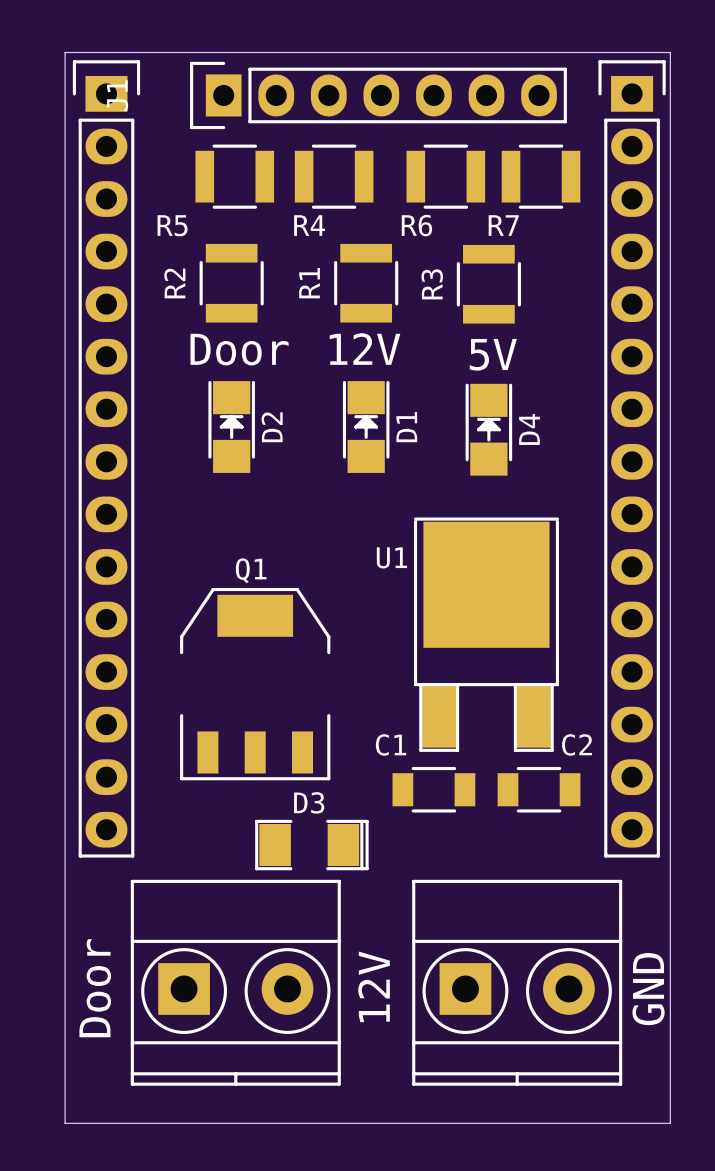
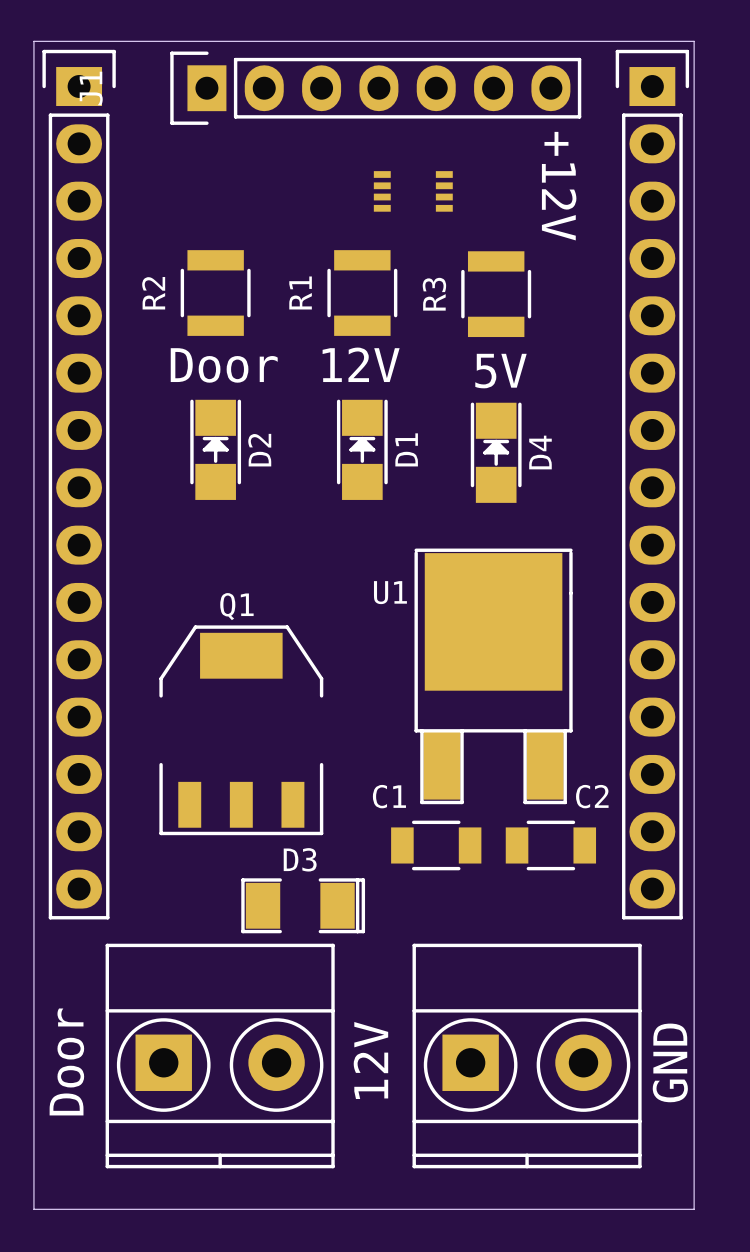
R5: (234, 176) -> none
R4: (334, 176) -> none
R6: (445, 176) -> none
R7: (541, 176) -> none
text: none -> +12V (559, 186)
part: none -> (413, 191)

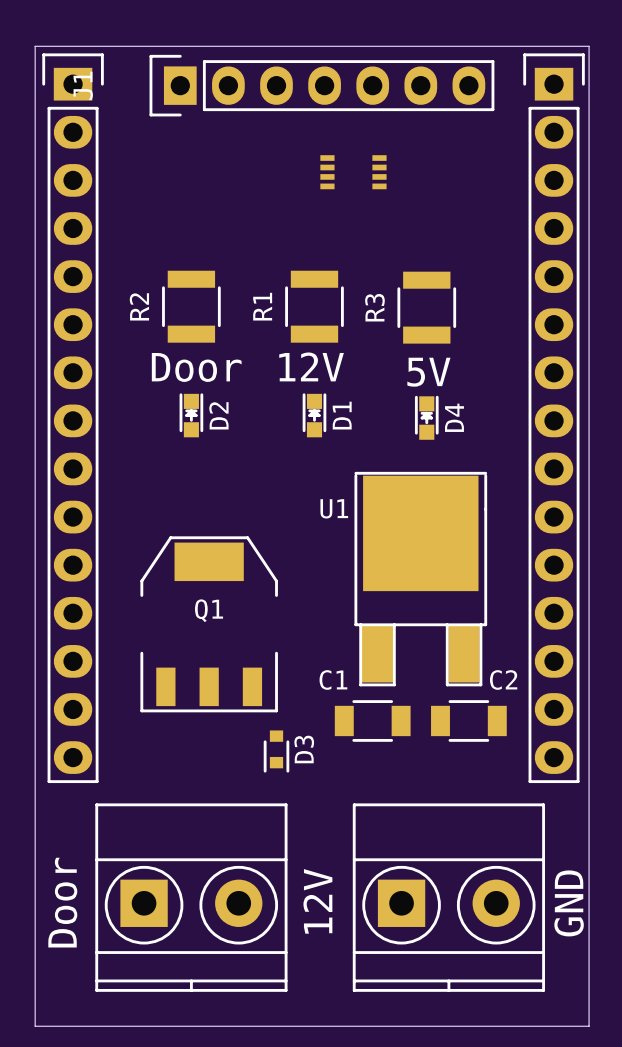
text: +12V (559, 186) -> none
R2 position: (215, 293) -> (191, 306)
R1 position: (362, 293) -> (314, 306)
R3 position: (496, 294) -> (426, 307)
text position: 12V (361, 364) -> 12V (311, 366)
text position: Door (224, 365) -> Door (196, 367)
text position: 5V (501, 371) -> 5V (428, 372)
D2 footprint: [190, 399, 242, 500] -> [179, 393, 204, 438]
D1 footprint: [336, 399, 388, 500] -> [302, 393, 327, 438]
D4 footprint: [470, 402, 522, 503] -> [414, 395, 439, 440]
Q1 name position: Q1 (236, 606) -> Q1 (209, 610)
D3 name position: D3 (300, 859) -> D3 (304, 749)
D3 footprint: [241, 878, 366, 934] -> [263, 730, 290, 773]

